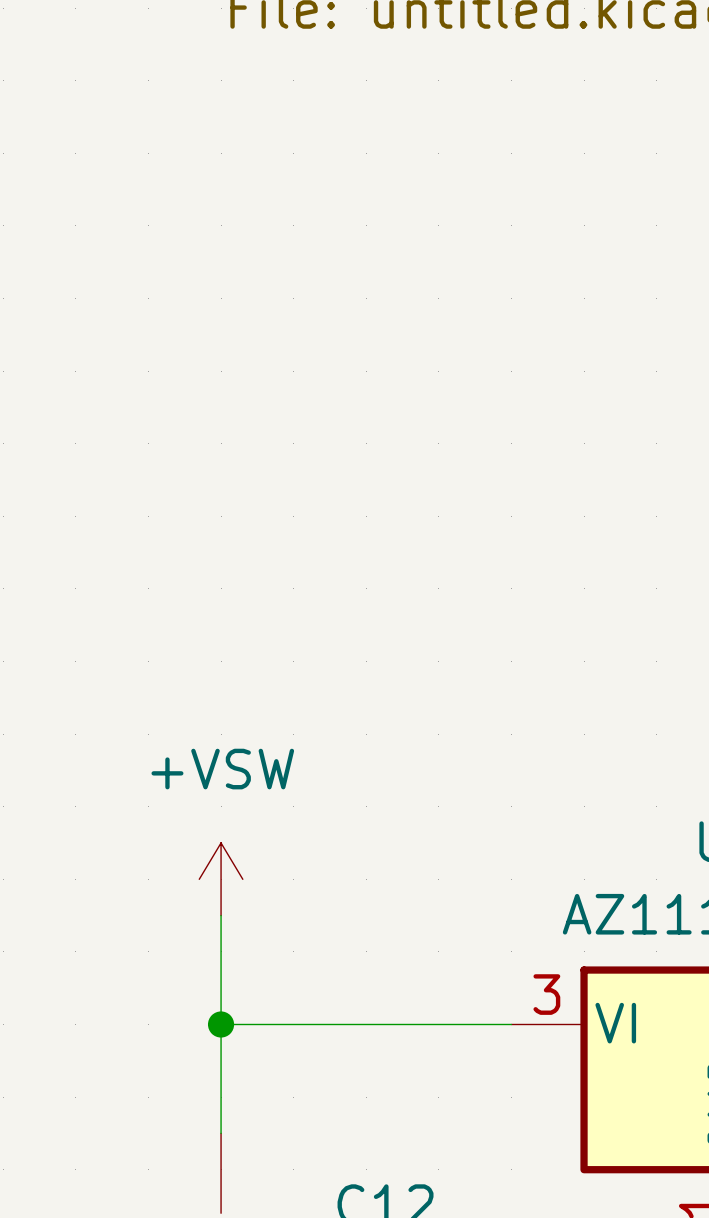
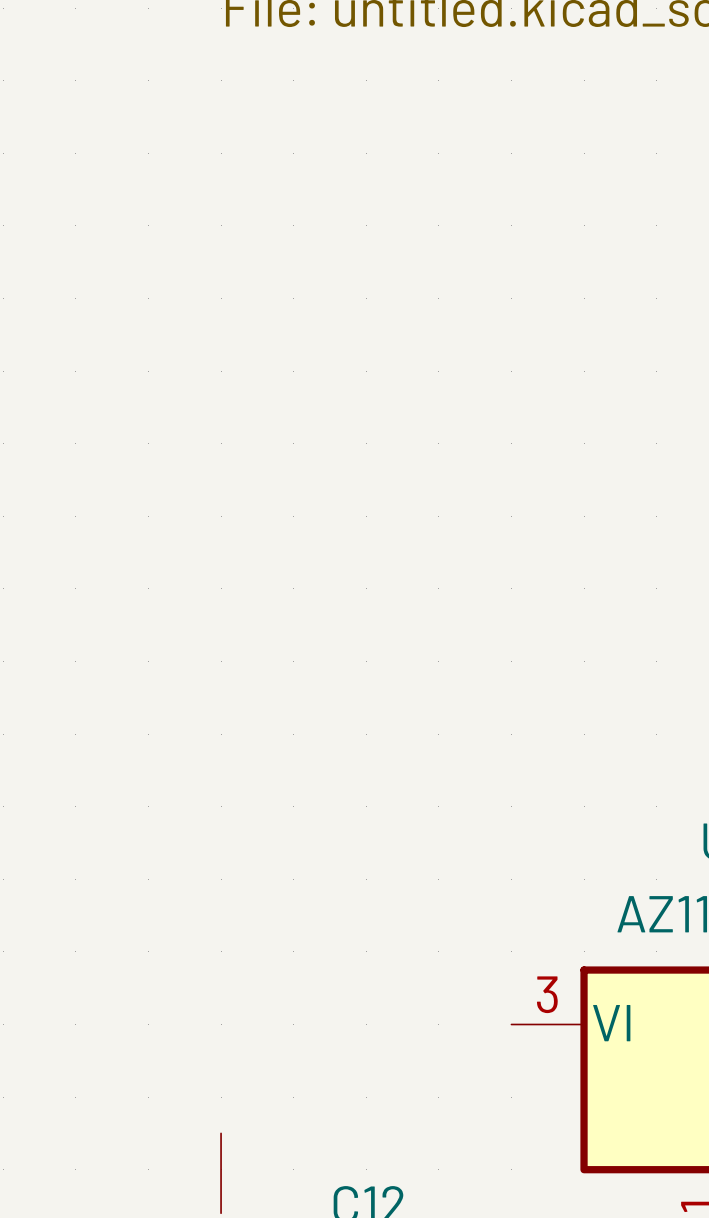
power symbol: +VSW (221, 879) -> none
wire: (221, 915) (221, 1133) -> none
wire: (221, 1024) (511, 1024) -> none
junction: (221, 1024) -> none

